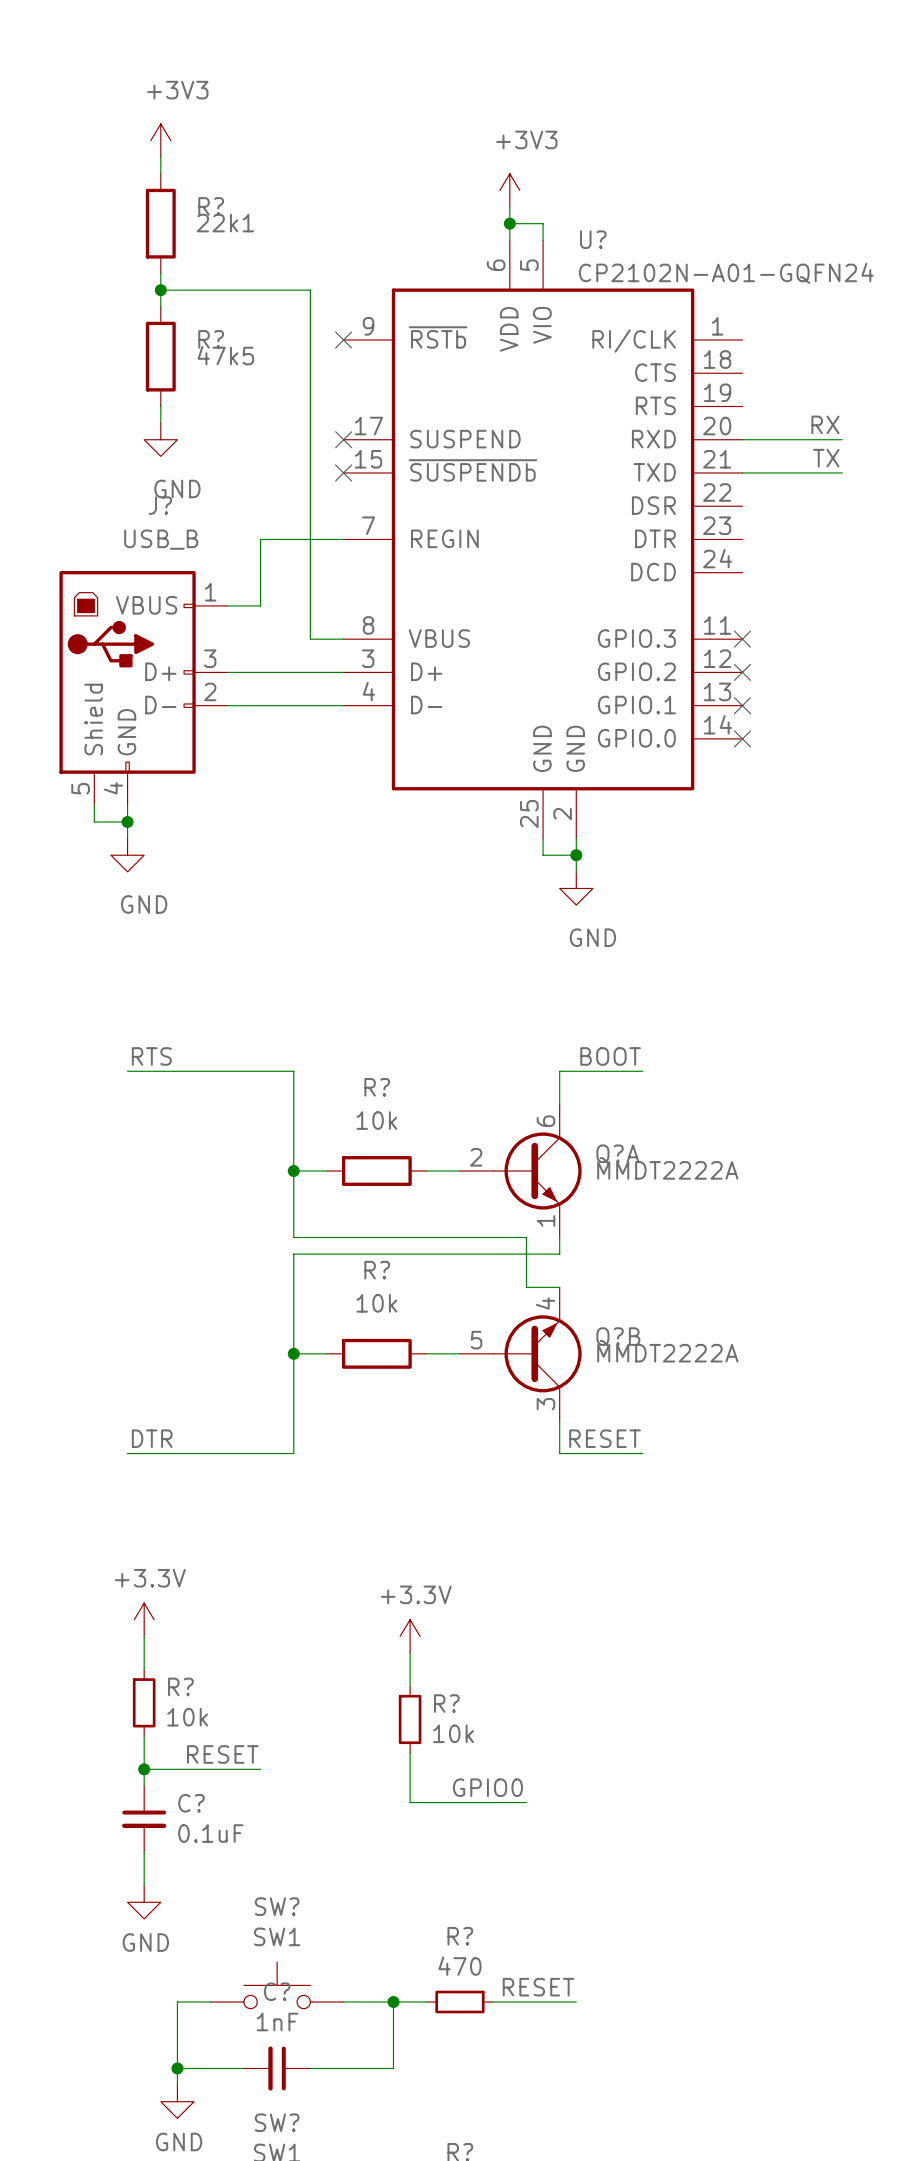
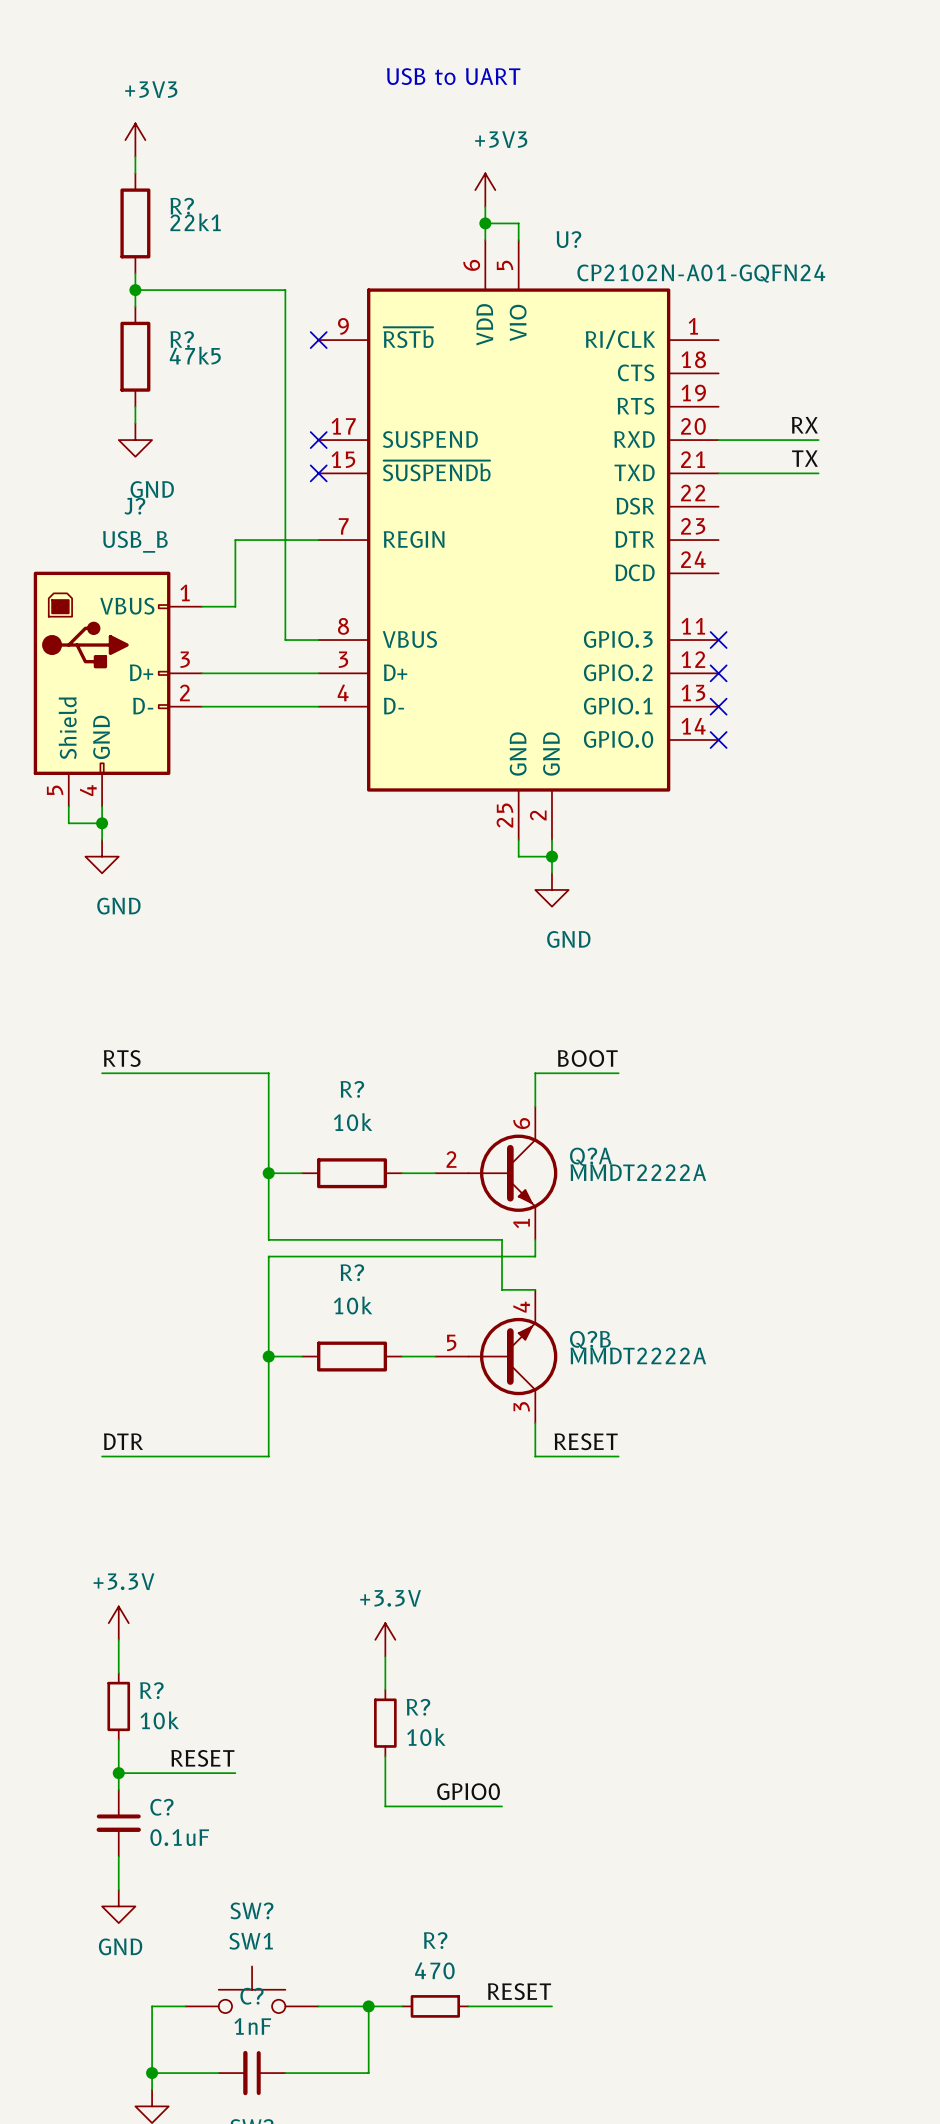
text: none -> USB to UART (453, 76)

